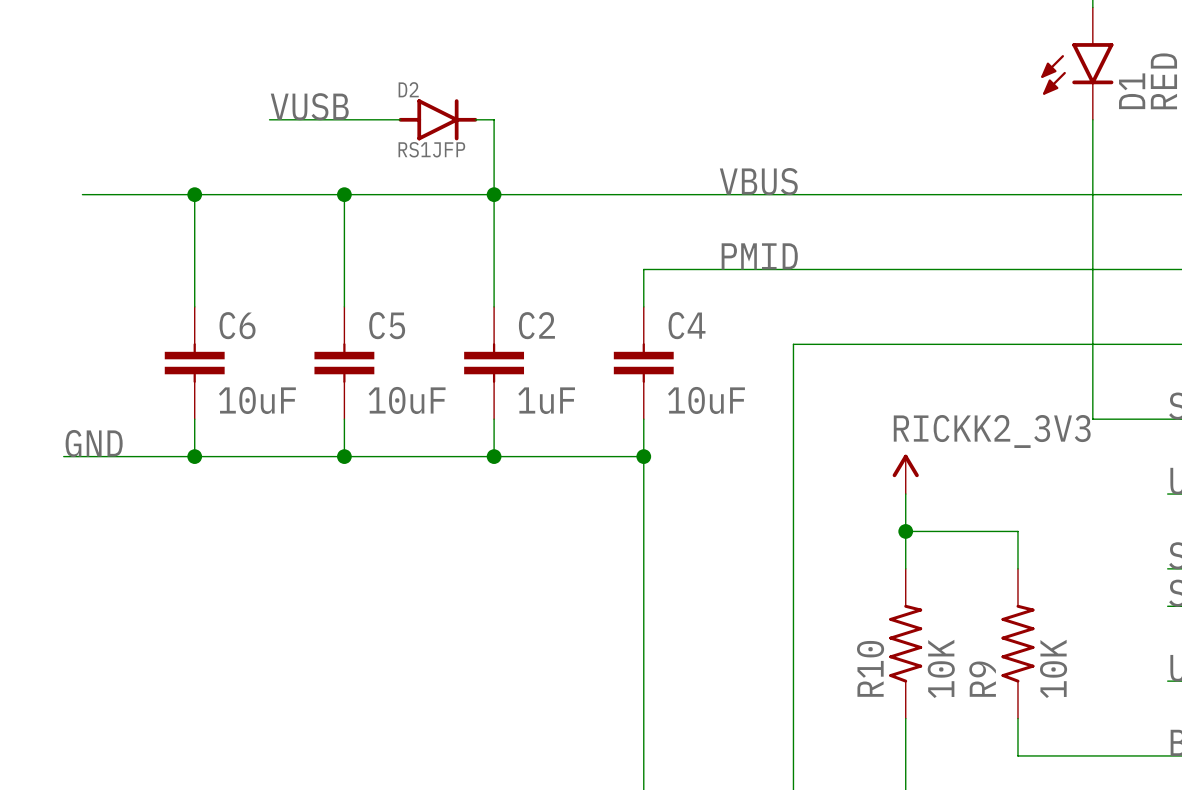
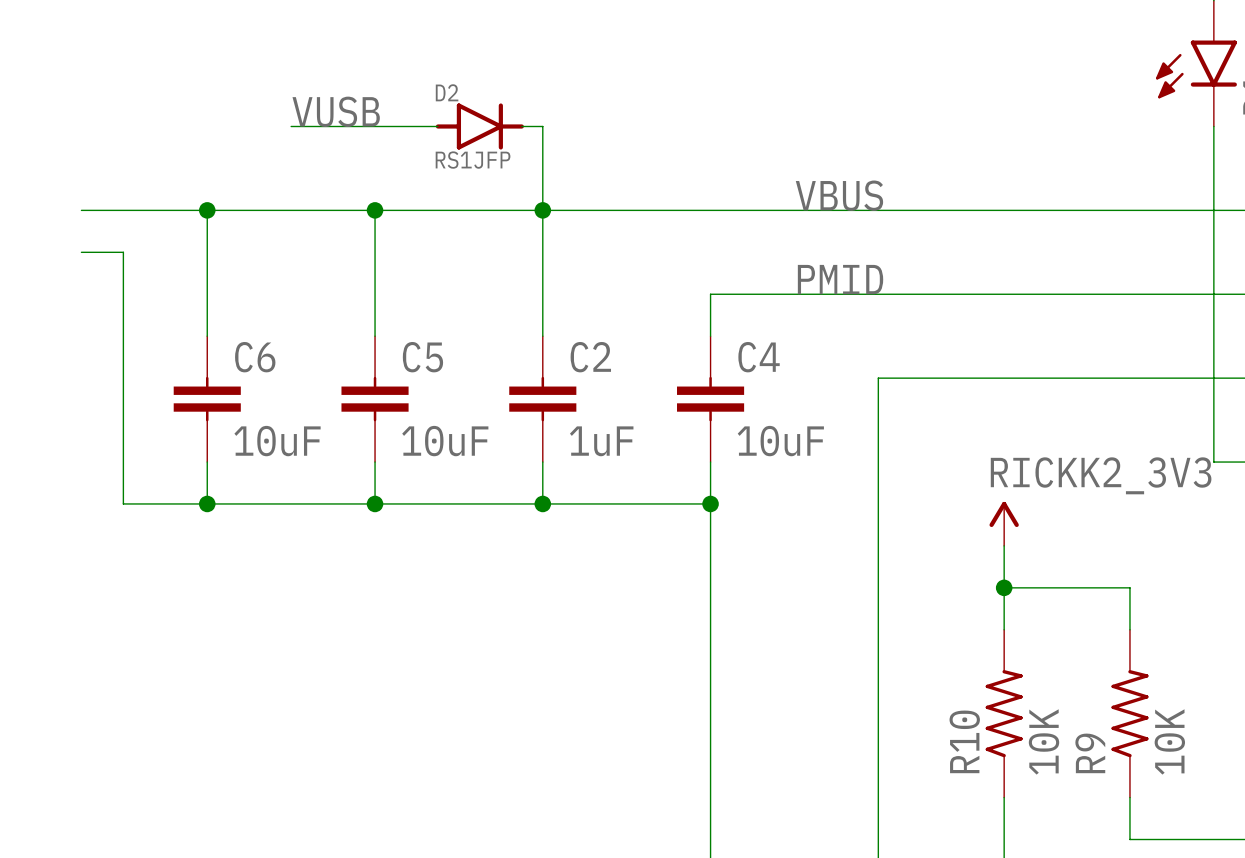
label: GND (94, 443) -> none
wire: (63, 456) (119, 456) -> (81, 252) (123, 252) (123, 503)

